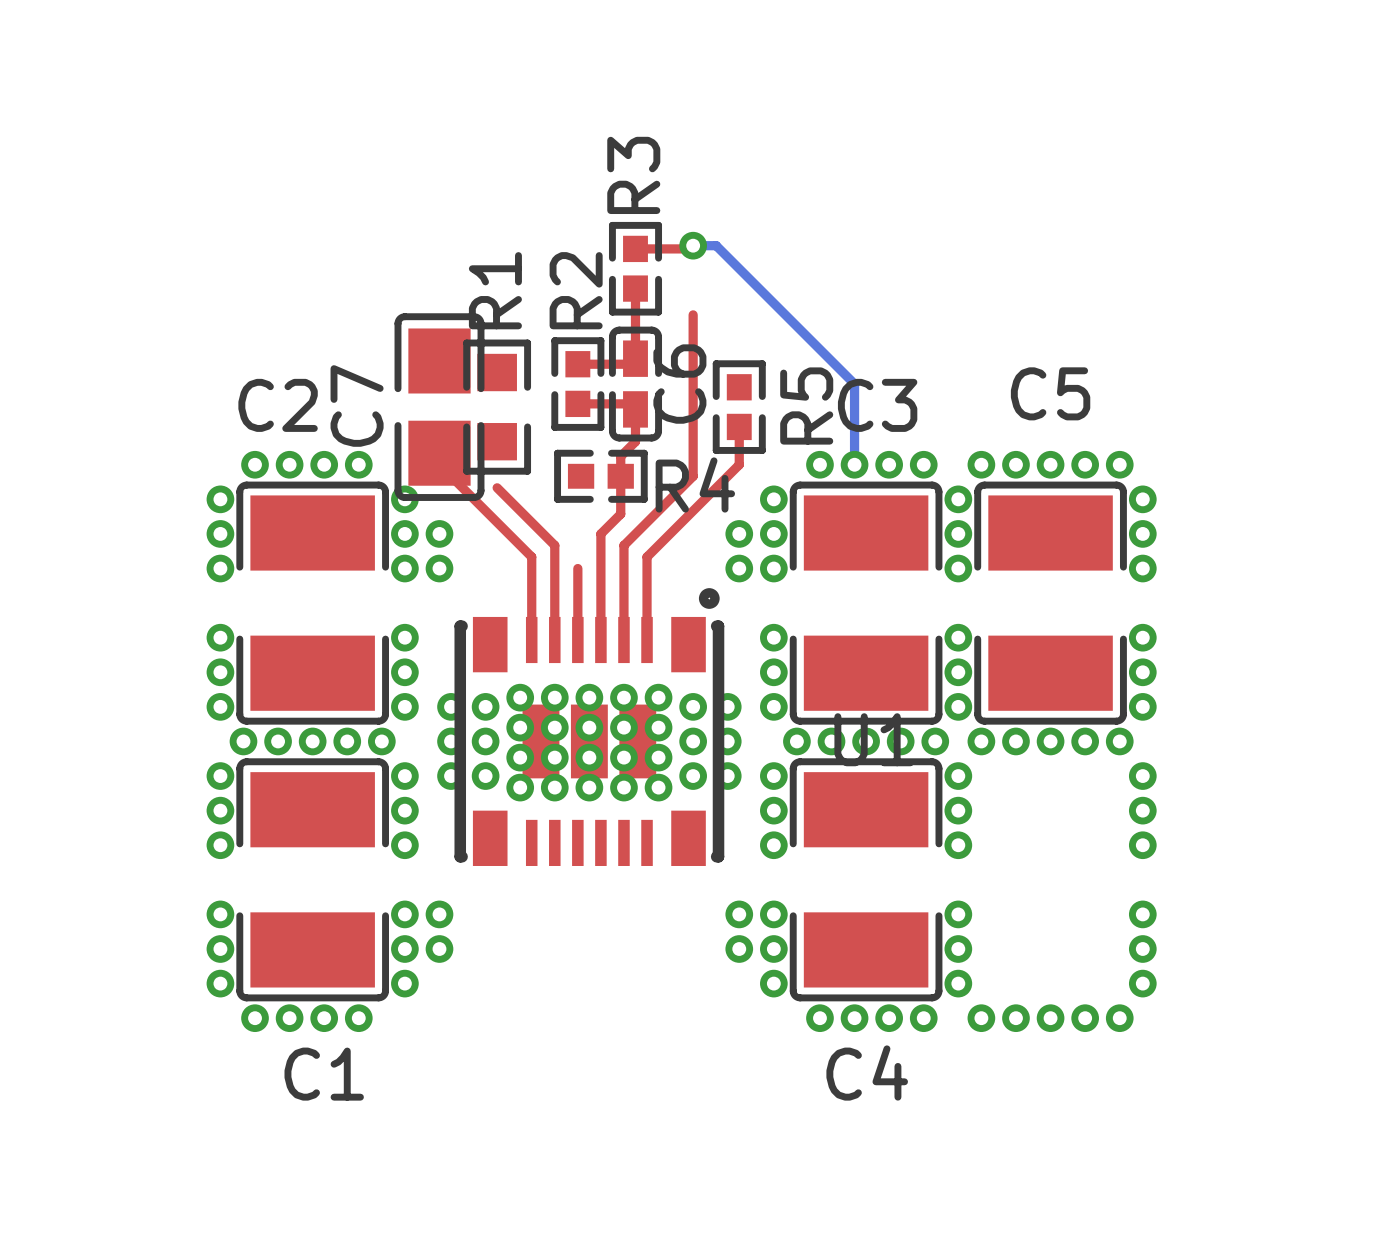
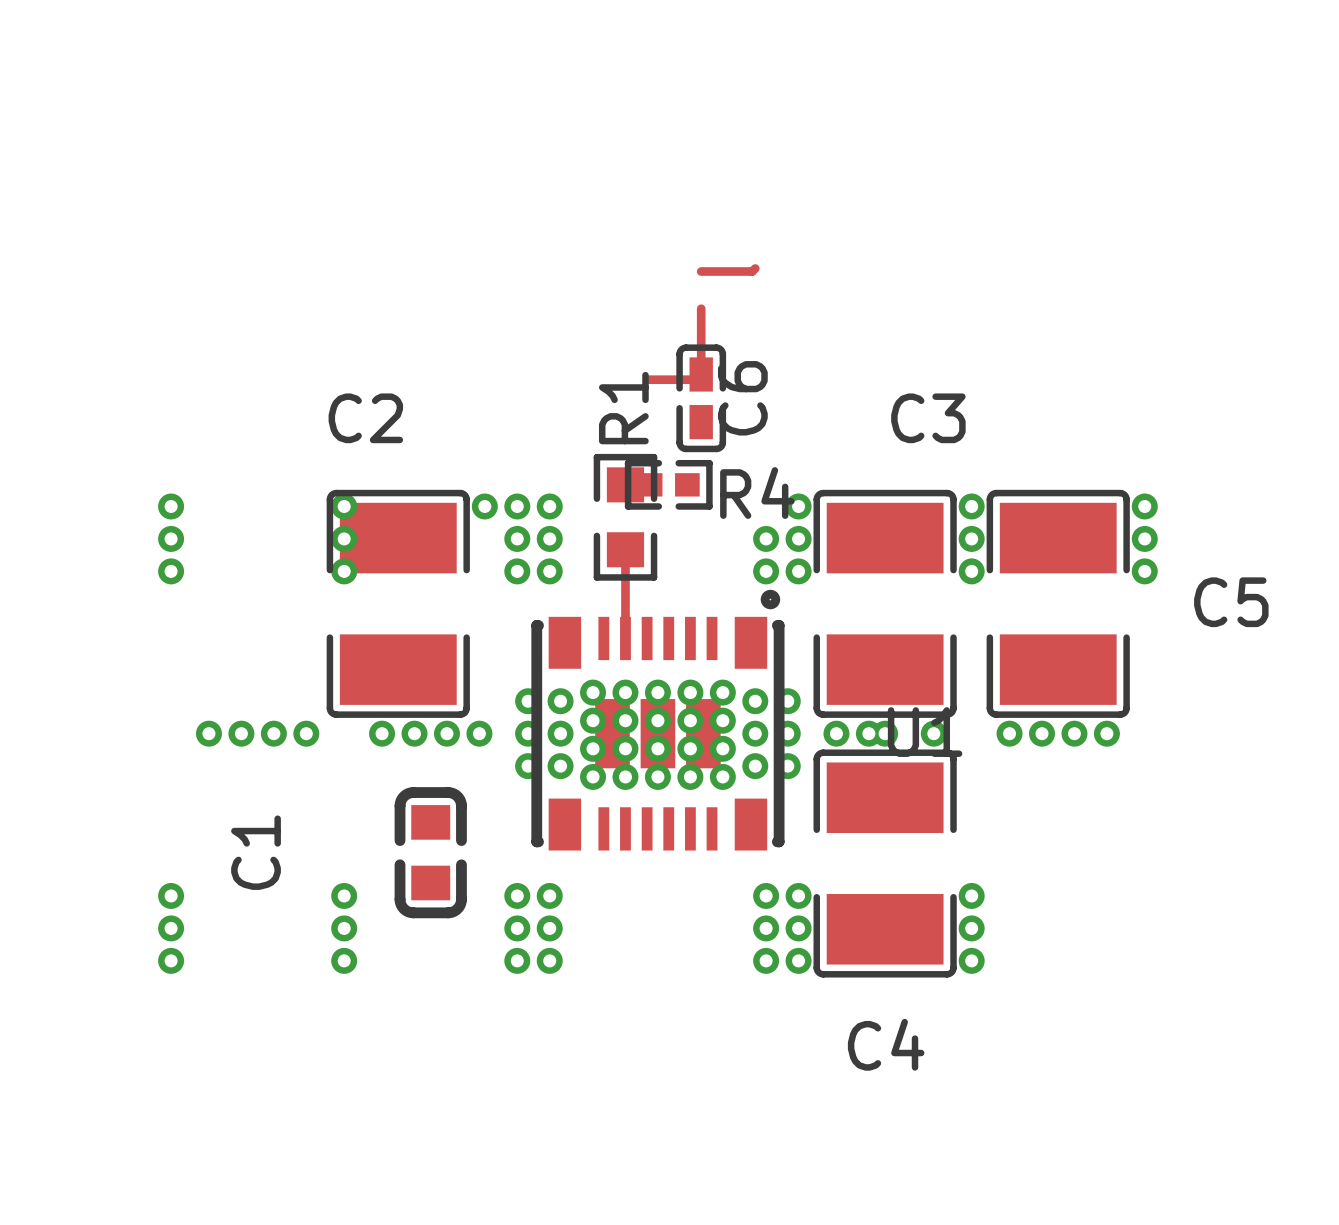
bottom track: (693, 245) (716, 245) (854, 384) (854, 464) -> none
via: (693, 245) -> none
R3: (635, 268) -> none
top track: (693, 314) (693, 476) (623, 545) (623, 640) -> none
R2: (577, 384) -> none
C5 name position: C5 (1050, 393) -> C5 (1231, 602)
top track: (577, 403) (629, 403) (635, 409) (635, 441) (620, 456) (620, 514) (600, 533) (600, 640) -> none
C7: (439, 407) -> none
R1 position: (497, 407) -> (625, 517)
R5: (739, 407) -> none
top track: (739, 426) (739, 464) (647, 556) (647, 640) -> none
via: (255, 464) -> none
via: (289, 464) -> none
via: (324, 464) -> none
via: (358, 464) -> none
top track: (439, 464) (531, 556) (531, 640) -> none
via: (819, 464) -> none
via: (854, 464) -> none
via: (889, 464) -> none
via: (923, 464) -> none
via: (981, 464) -> none
via: (1015, 464) -> none
via: (1050, 464) -> none
via: (1085, 464) -> none
via: (1119, 464) -> none
top track: (497, 487) (554, 545) -> none
via: none -> (171, 506)
via: (220, 499) -> none
via: none -> (344, 506)
via: none -> (517, 506)
via: none -> (549, 506)
via: none -> (798, 506)
via: (773, 499) -> none
via: none -> (971, 506)
via: (958, 499) -> none
via: none -> (1144, 506)
via: (1142, 499) -> none
via: none -> (171, 538)
via: (220, 533) -> none
via: none -> (344, 538)
via: (404, 533) -> none
via: none -> (549, 538)
via: none -> (766, 538)
via: (773, 533) -> none
via: none -> (971, 538)
via: (958, 533) -> none
via: none -> (1144, 538)
via: (1142, 533) -> none
via: none -> (171, 571)
via: (220, 568) -> none
via: none -> (344, 571)
via: (404, 568) -> none
via: none -> (549, 571)
top track: (577, 568) (577, 640) -> none
via: none -> (766, 571)
via: (773, 568) -> none
via: none -> (971, 571)
via: (958, 568) -> none
via: none -> (1144, 571)
via: (1142, 568) -> none
C3 position: (866, 603) -> (885, 603)
C5 position: (1050, 603) -> (1058, 603)
via: (220, 637) -> none
via: (404, 637) -> none
via: (773, 637) -> none
via: (958, 637) -> none
via: (1142, 637) -> none
via: (220, 672) -> none
via: (404, 672) -> none
via: (773, 672) -> none
via: (958, 672) -> none
via: (1142, 672) -> none
via: (220, 706) -> none
via: (404, 706) -> none
via: (773, 706) -> none
via: (958, 706) -> none
via: (1142, 706) -> none
via: none -> (208, 733)
via: none -> (241, 733)
via: none -> (273, 733)
via: none -> (306, 733)
via: (243, 741) -> none
via: (278, 741) -> none
via: none -> (382, 733)
via: (312, 741) -> none
via: none -> (414, 733)
via: (347, 741) -> none
via: none -> (446, 733)
via: (381, 741) -> none
via: none -> (479, 733)
via: none -> (836, 733)
via: (796, 741) -> none
via: none -> (868, 733)
via: (866, 741) -> none
via: none -> (933, 733)
via: (900, 741) -> none
via: (935, 741) -> none
via: none -> (1009, 733)
via: (981, 741) -> none
via: none -> (1042, 733)
via: (1015, 741) -> none
via: none -> (1074, 733)
via: (1050, 741) -> none
via: none -> (1106, 733)
via: (1085, 741) -> none
via: (1119, 741) -> none
C1 footprint: [236, 758, 389, 1002] -> [394, 787, 467, 919]
via: (220, 776) -> none
via: (404, 776) -> none
via: (773, 776) -> none
via: (958, 776) -> none
via: (1142, 776) -> none
via: (220, 810) -> none
via: (404, 810) -> none
via: (773, 810) -> none
via: (958, 810) -> none
via: (1142, 810) -> none
via: (220, 845) -> none
via: (404, 845) -> none
via: (773, 845) -> none
via: (958, 845) -> none
via: (1142, 845) -> none
C4 position: (866, 879) -> (885, 863)
via: none -> (171, 895)
via: (220, 914) -> none
via: none -> (344, 895)
via: (404, 914) -> none
via: none -> (549, 895)
via: none -> (766, 895)
via: (773, 914) -> none
via: none -> (971, 895)
via: (958, 914) -> none
via: (1142, 914) -> none
via: none -> (171, 928)
via: (220, 949) -> none
via: none -> (344, 928)
via: (404, 949) -> none
via: none -> (549, 928)
via: none -> (766, 928)
via: (773, 949) -> none
via: none -> (971, 928)
via: (958, 949) -> none
via: (1142, 949) -> none
via: none -> (171, 960)
via: (220, 983) -> none
via: none -> (344, 960)
via: (404, 983) -> none
via: none -> (517, 960)
via: none -> (549, 960)
via: none -> (766, 960)
via: none -> (798, 960)
via: (773, 983) -> none
via: none -> (971, 960)
via: (958, 983) -> none
via: (1142, 983) -> none
via: (255, 1018) -> none
via: (289, 1018) -> none
via: (324, 1018) -> none
via: (358, 1018) -> none
via: (819, 1018) -> none
via: (854, 1018) -> none
via: (889, 1018) -> none
via: (923, 1018) -> none
via: (981, 1018) -> none
via: (1015, 1018) -> none
via: (1050, 1018) -> none
via: (1085, 1018) -> none
via: (1119, 1018) -> none
C1 name position: C1 (324, 1074) -> C1 (256, 852)

